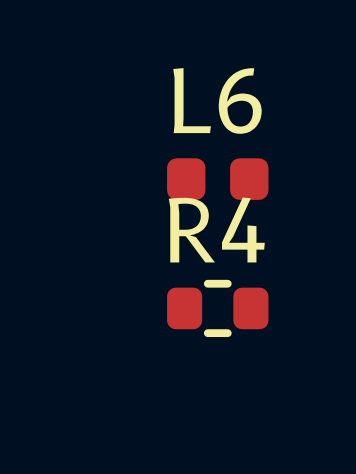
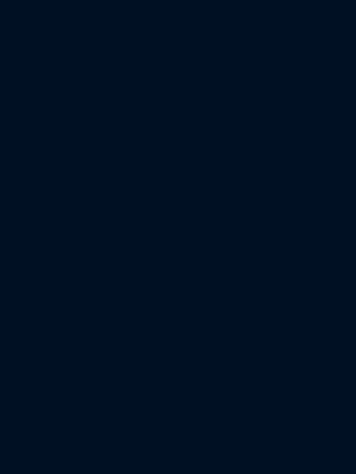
L6: (217, 179) -> none
R4: (217, 308) -> none

